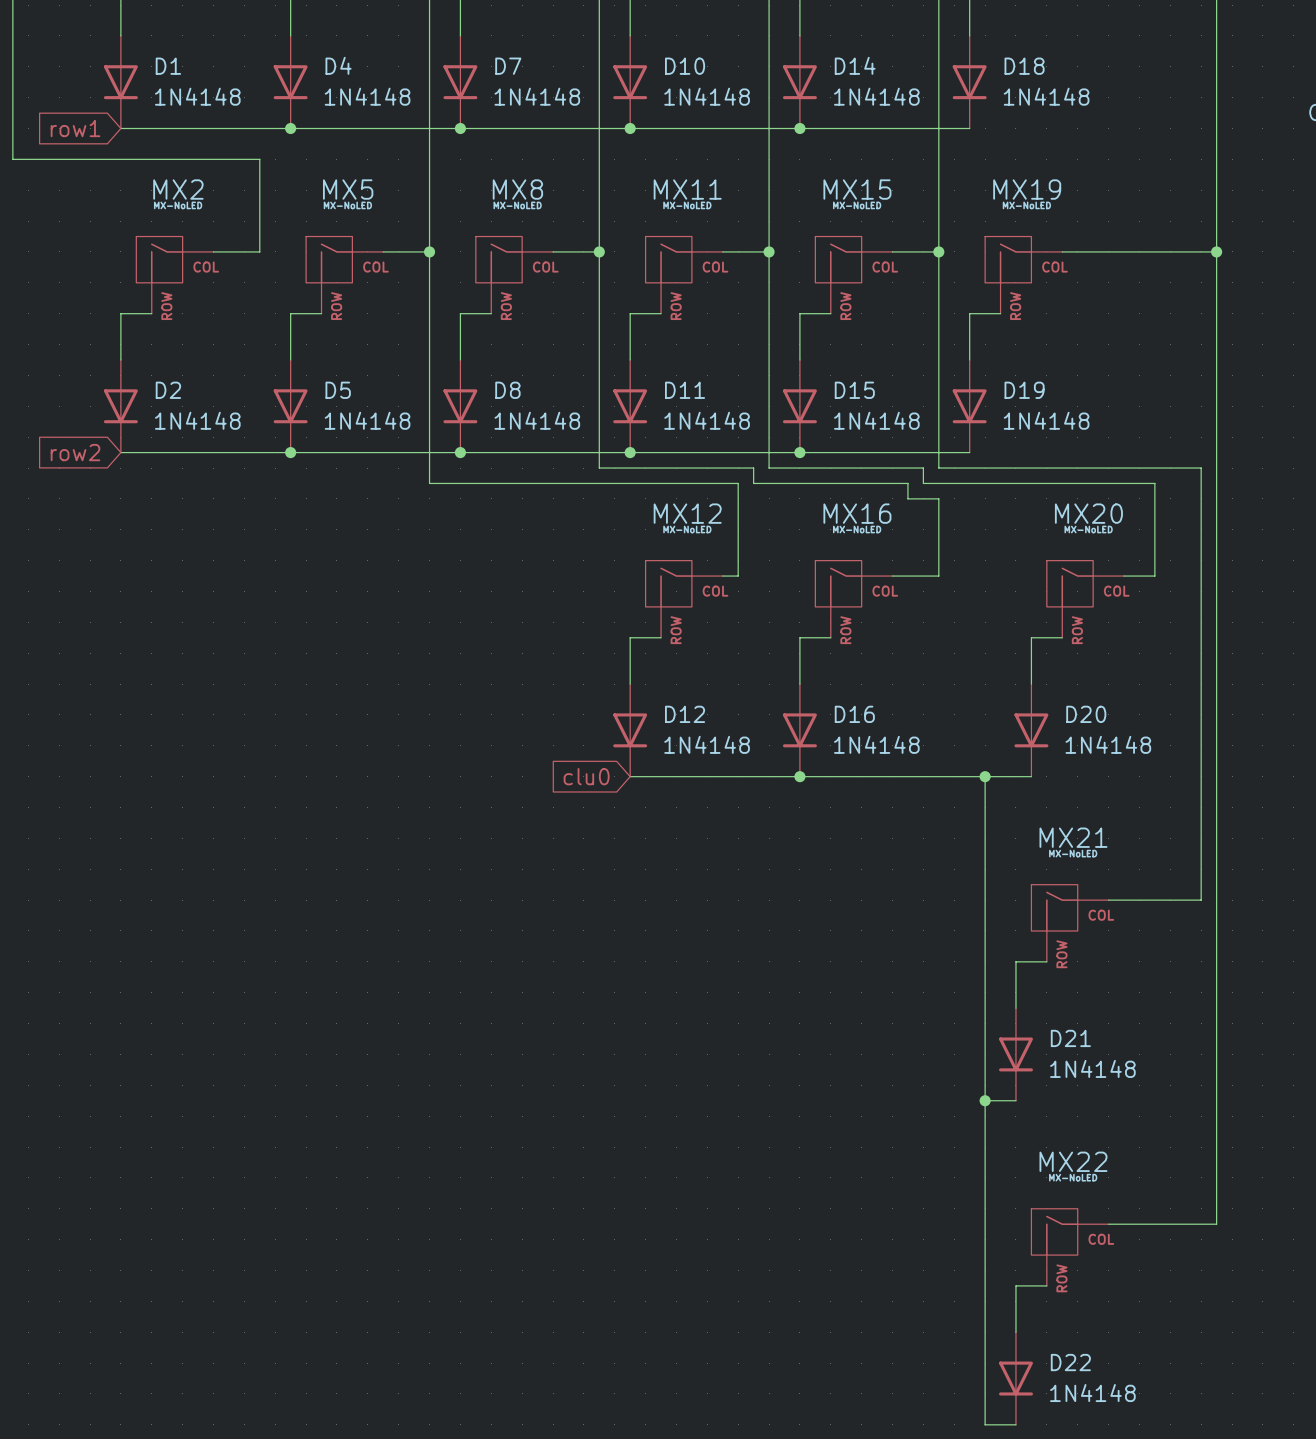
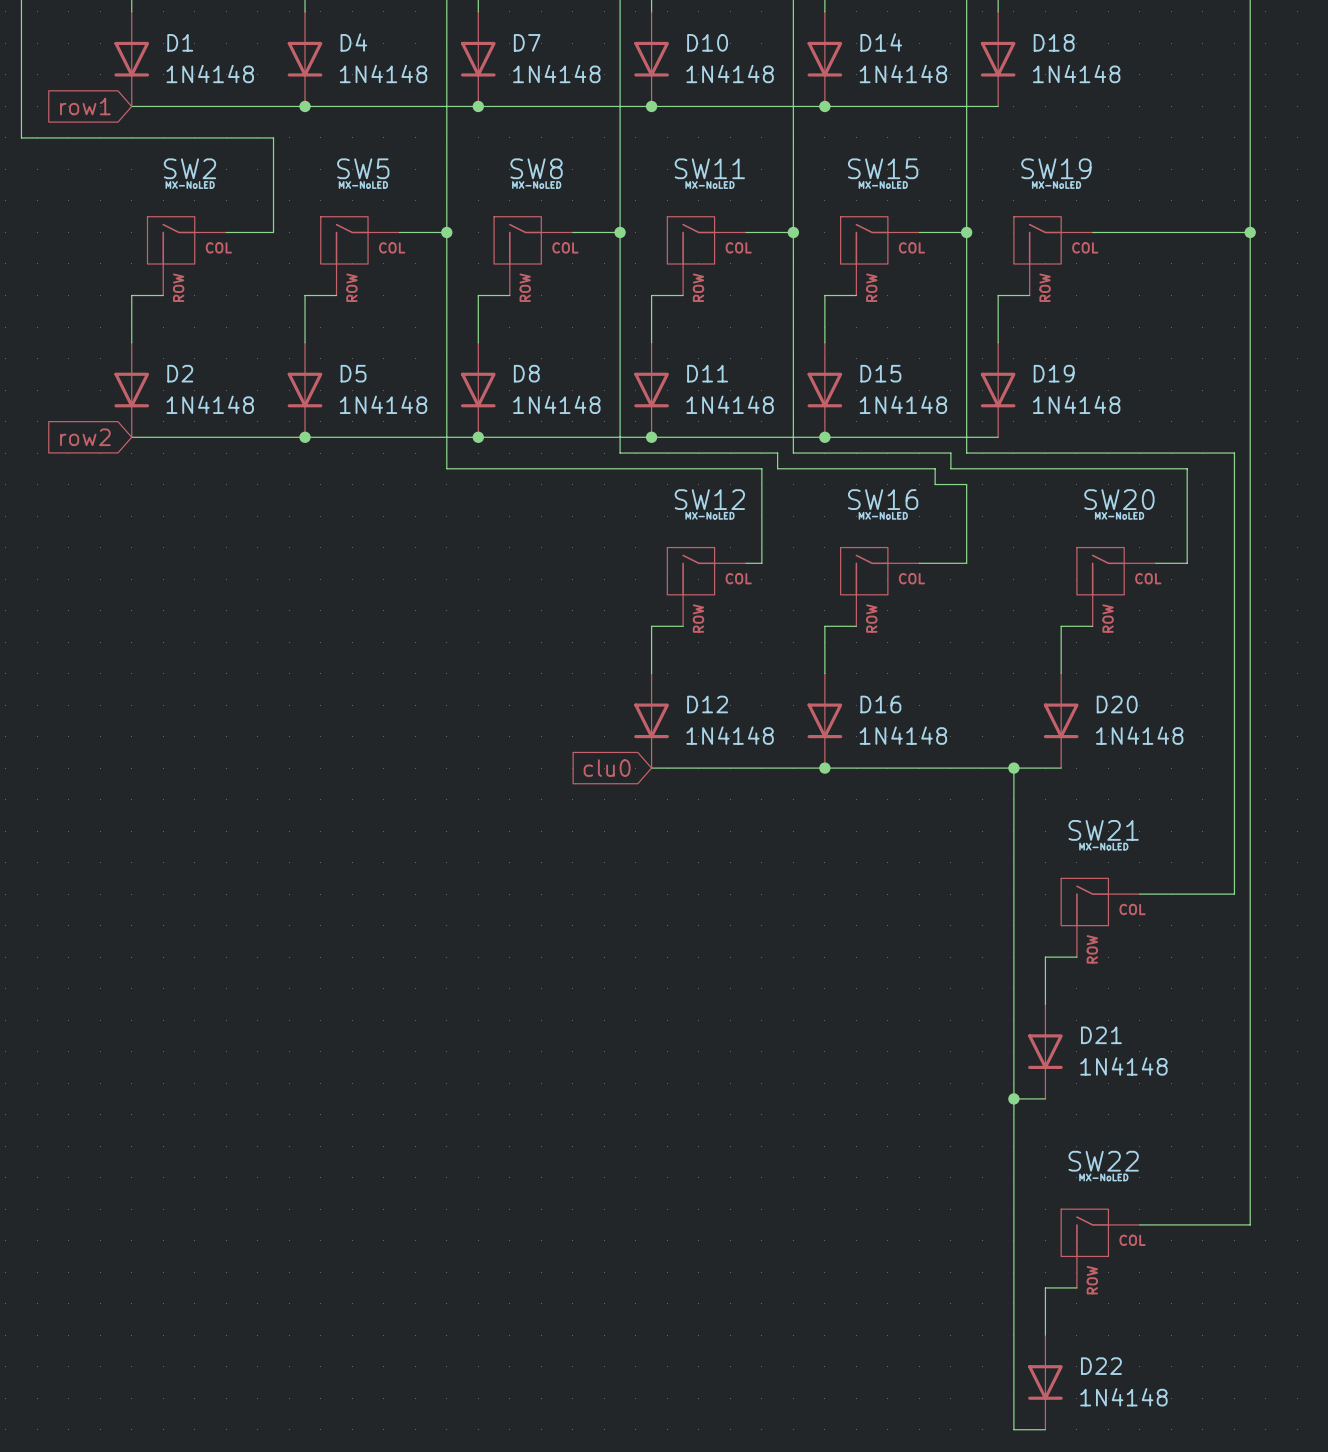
MX2 name: MX2 (178, 189) -> SW2 (189, 168)
MX5 name: MX5 (348, 189) -> SW5 (363, 168)
MX8 name: MX8 (517, 189) -> SW8 (536, 168)
MX11 name: MX11 (687, 189) -> SW11 (709, 168)
MX15 name: MX15 (857, 189) -> SW15 (883, 168)
MX19 name: MX19 (1027, 189) -> SW19 (1056, 168)
MX12 name: MX12 (687, 513) -> SW12 (709, 499)
MX16 name: MX16 (857, 513) -> SW16 (883, 499)
MX20 name: MX20 (1088, 513) -> SW20 (1119, 499)
MX21 name: MX21 (1073, 837) -> SW21 (1103, 830)
MX22 name: MX22 (1073, 1161) -> SW22 (1103, 1161)

